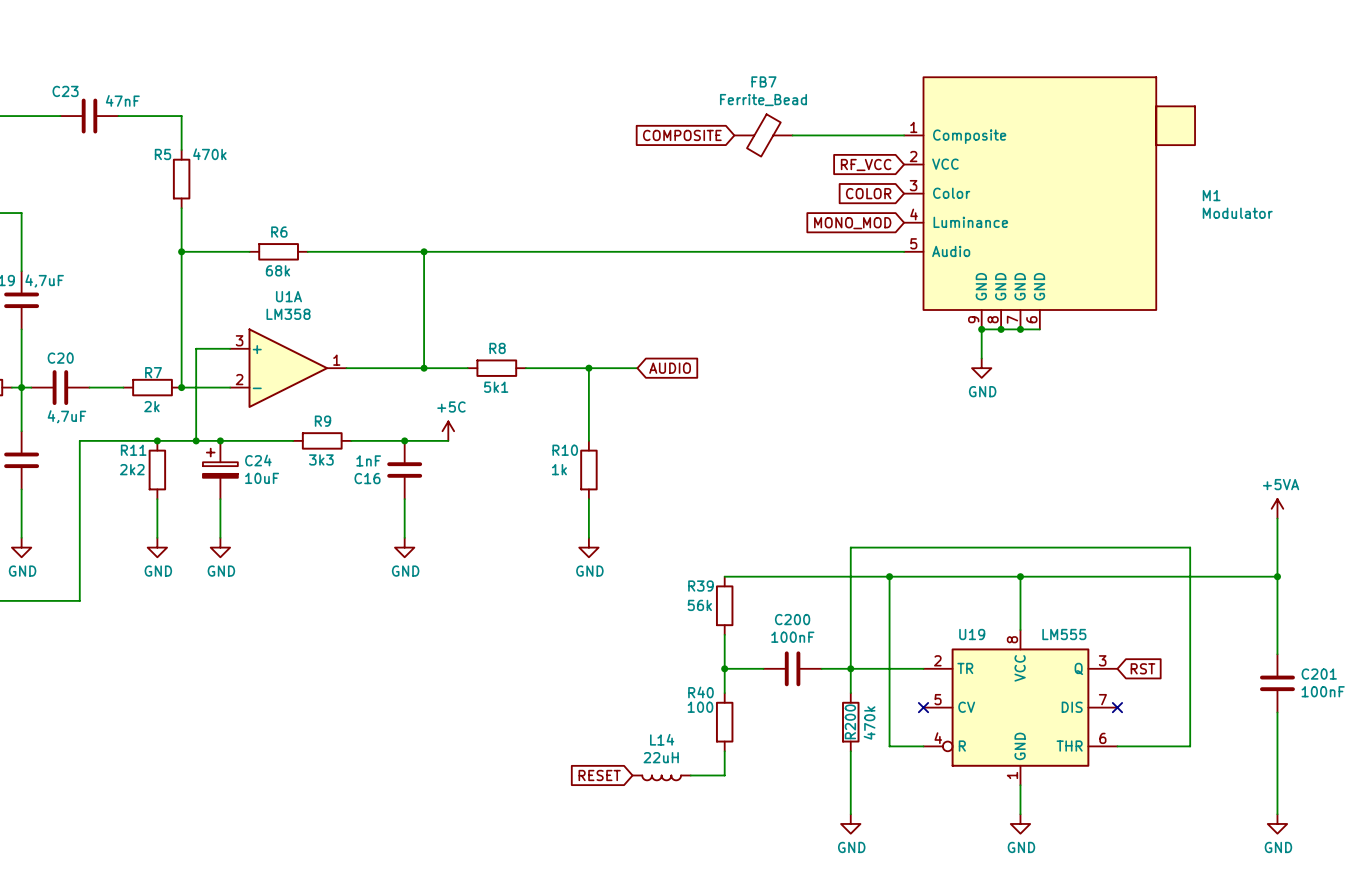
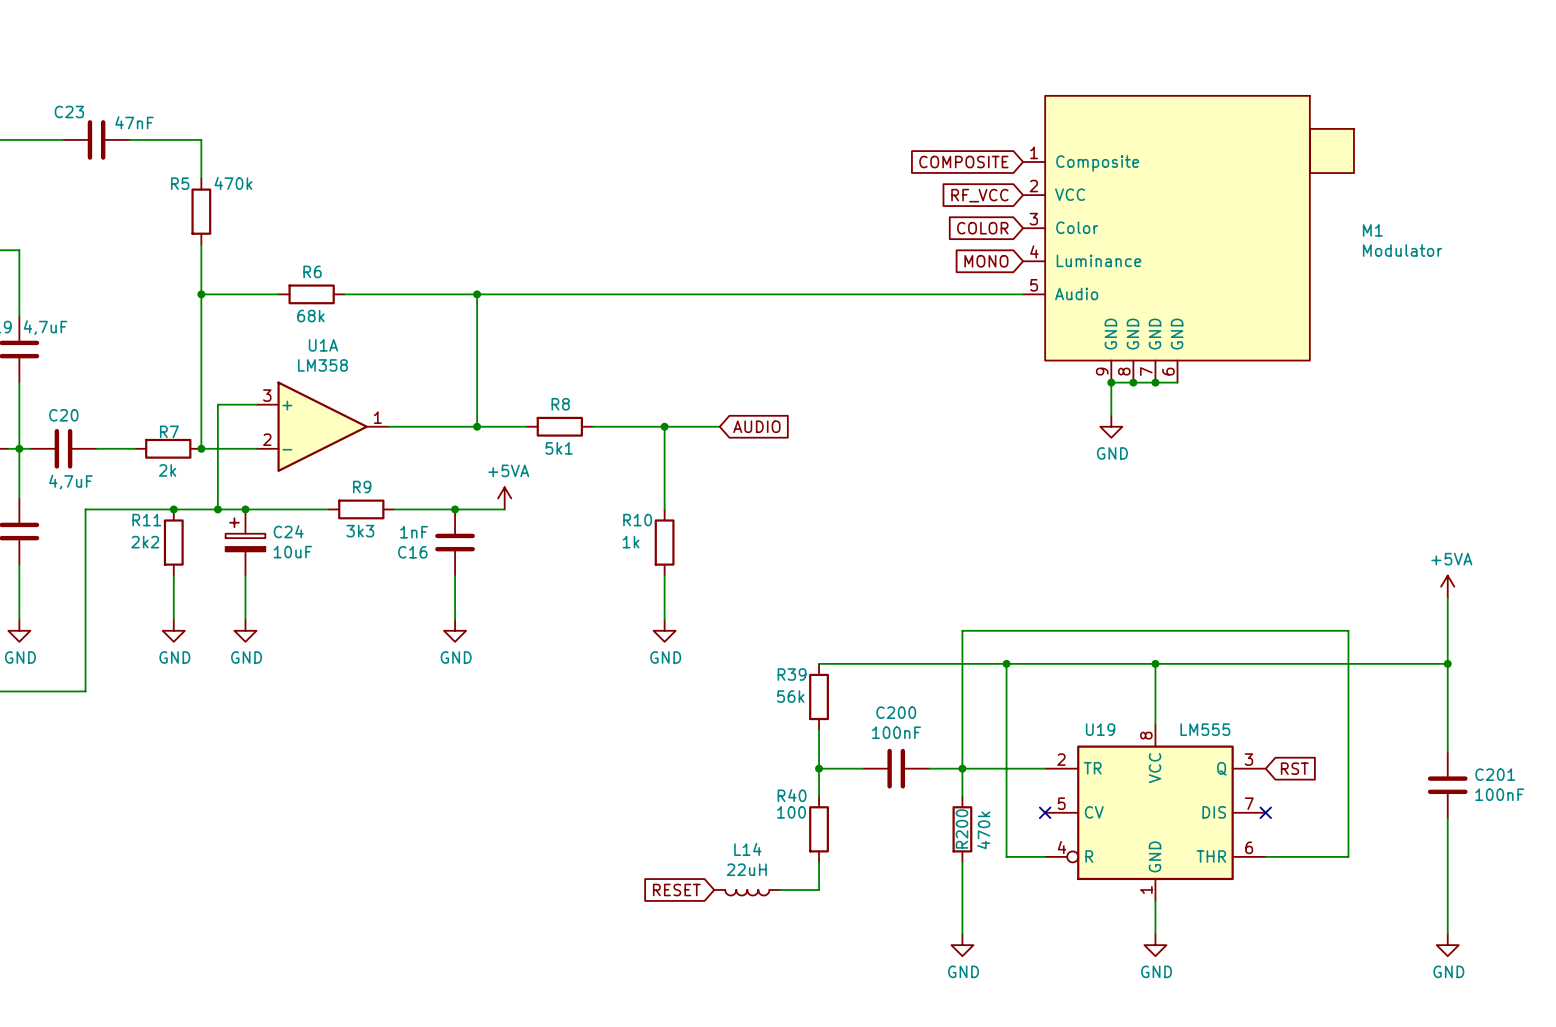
global label position: COMPOSITE (682, 135) -> COMPOSITE (963, 162)
FB7: Ferrite_Bead (763, 135) -> none
wire: (792, 135) (904, 135) -> none
global label: MONO_MOD (852, 223) -> MONO (986, 261)
power symbol: +5C (448, 431) -> +5VA (504, 498)

